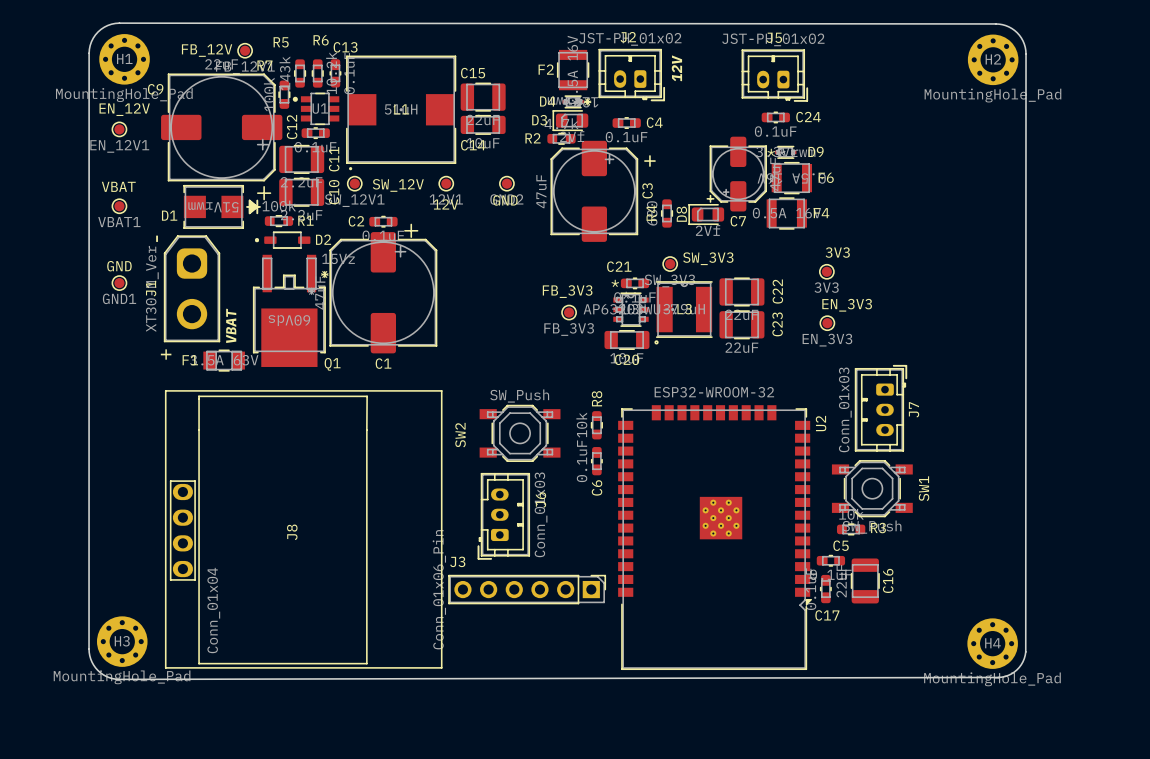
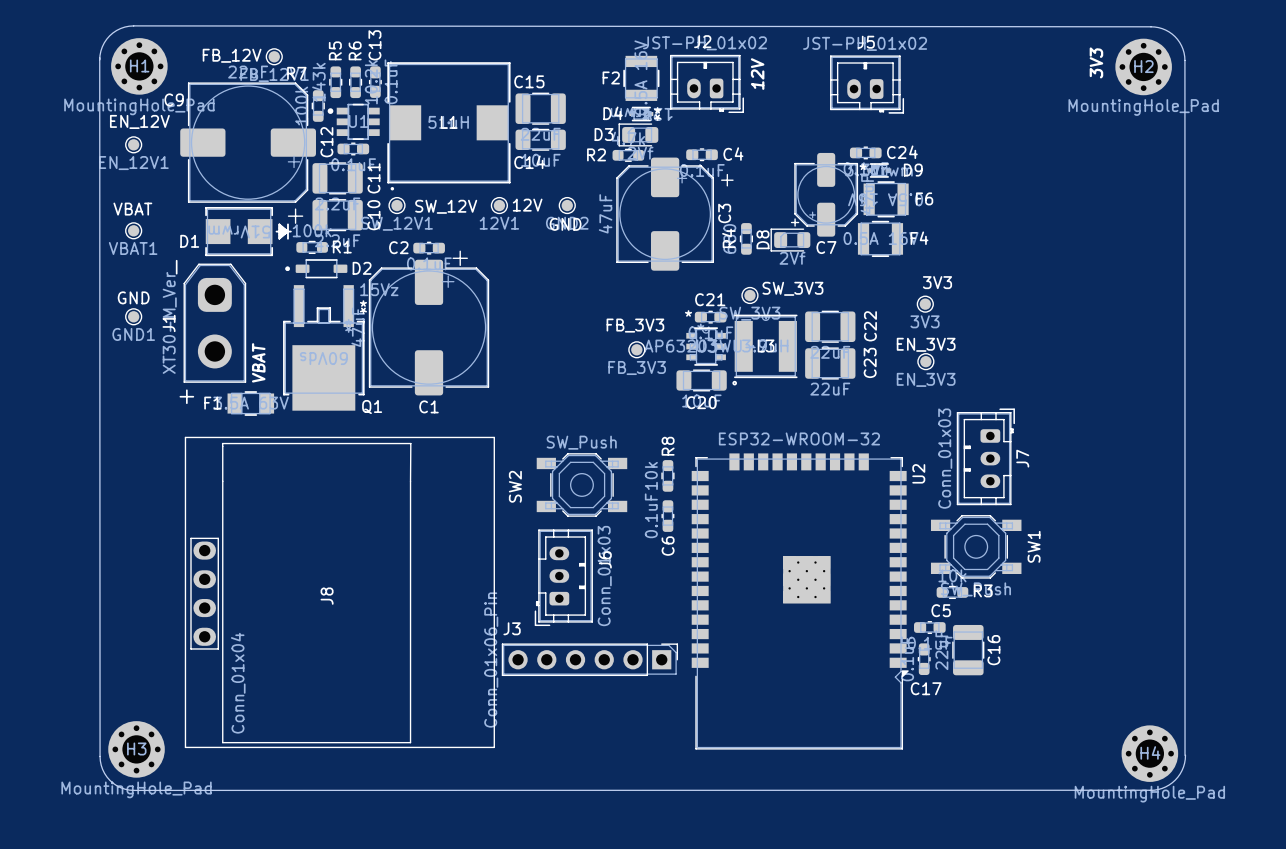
board edge: (119, 23) (107, 25) (98, 31) (91, 41) (89, 53) (89, 648) (90, 659) (97, 670) (109, 677) (119, 679) (998, 677) (1014, 672) (1021, 664) (1025, 651) (1026, 54) -> (133, 25) (120, 28) (109, 35) (102, 46) (99, 59)
board edge: (995, 23) (1008, 26) (1017, 32) (1024, 44) (1026, 54) -> (1114, 26) (1154, 27) (1165, 30) (1179, 42) (1184, 60)
R6 name rotation: 0° (321, 40) -> 90° counterclockwise (355, 50)
R5 name rotation: 0° (281, 42) -> 90° counterclockwise (335, 50)
C13 name rotation: 0° (345, 47) -> 90° counterclockwise (374, 45)
board edge: none -> (99, 57) (100, 756) (102, 769) (109, 780) (121, 787) (133, 790)
board edge: none -> (1184, 60) (1185, 755)
text: none -> 3V3 (1096, 62)
H2 position: (993, 59) -> (1143, 66)
C24 position: (775, 117) -> (865, 152)
C4 position: (626, 123) -> (702, 154)
12V1 value position: 12V (445, 204) -> 12V (527, 205)
C21 name position: C21 (619, 266) -> C21 (710, 299)
EN_3V3 value position: EN_3V3 (847, 305) -> EN_3V3 (926, 344)
H3 position: (122, 641) -> (136, 749)
H4 position: (992, 643) -> (1149, 753)
board edge: none -> (1185, 755) (1182, 770) (1175, 780) (1162, 788) (1150, 790)
board edge: none -> (1151, 790) (133, 790)

